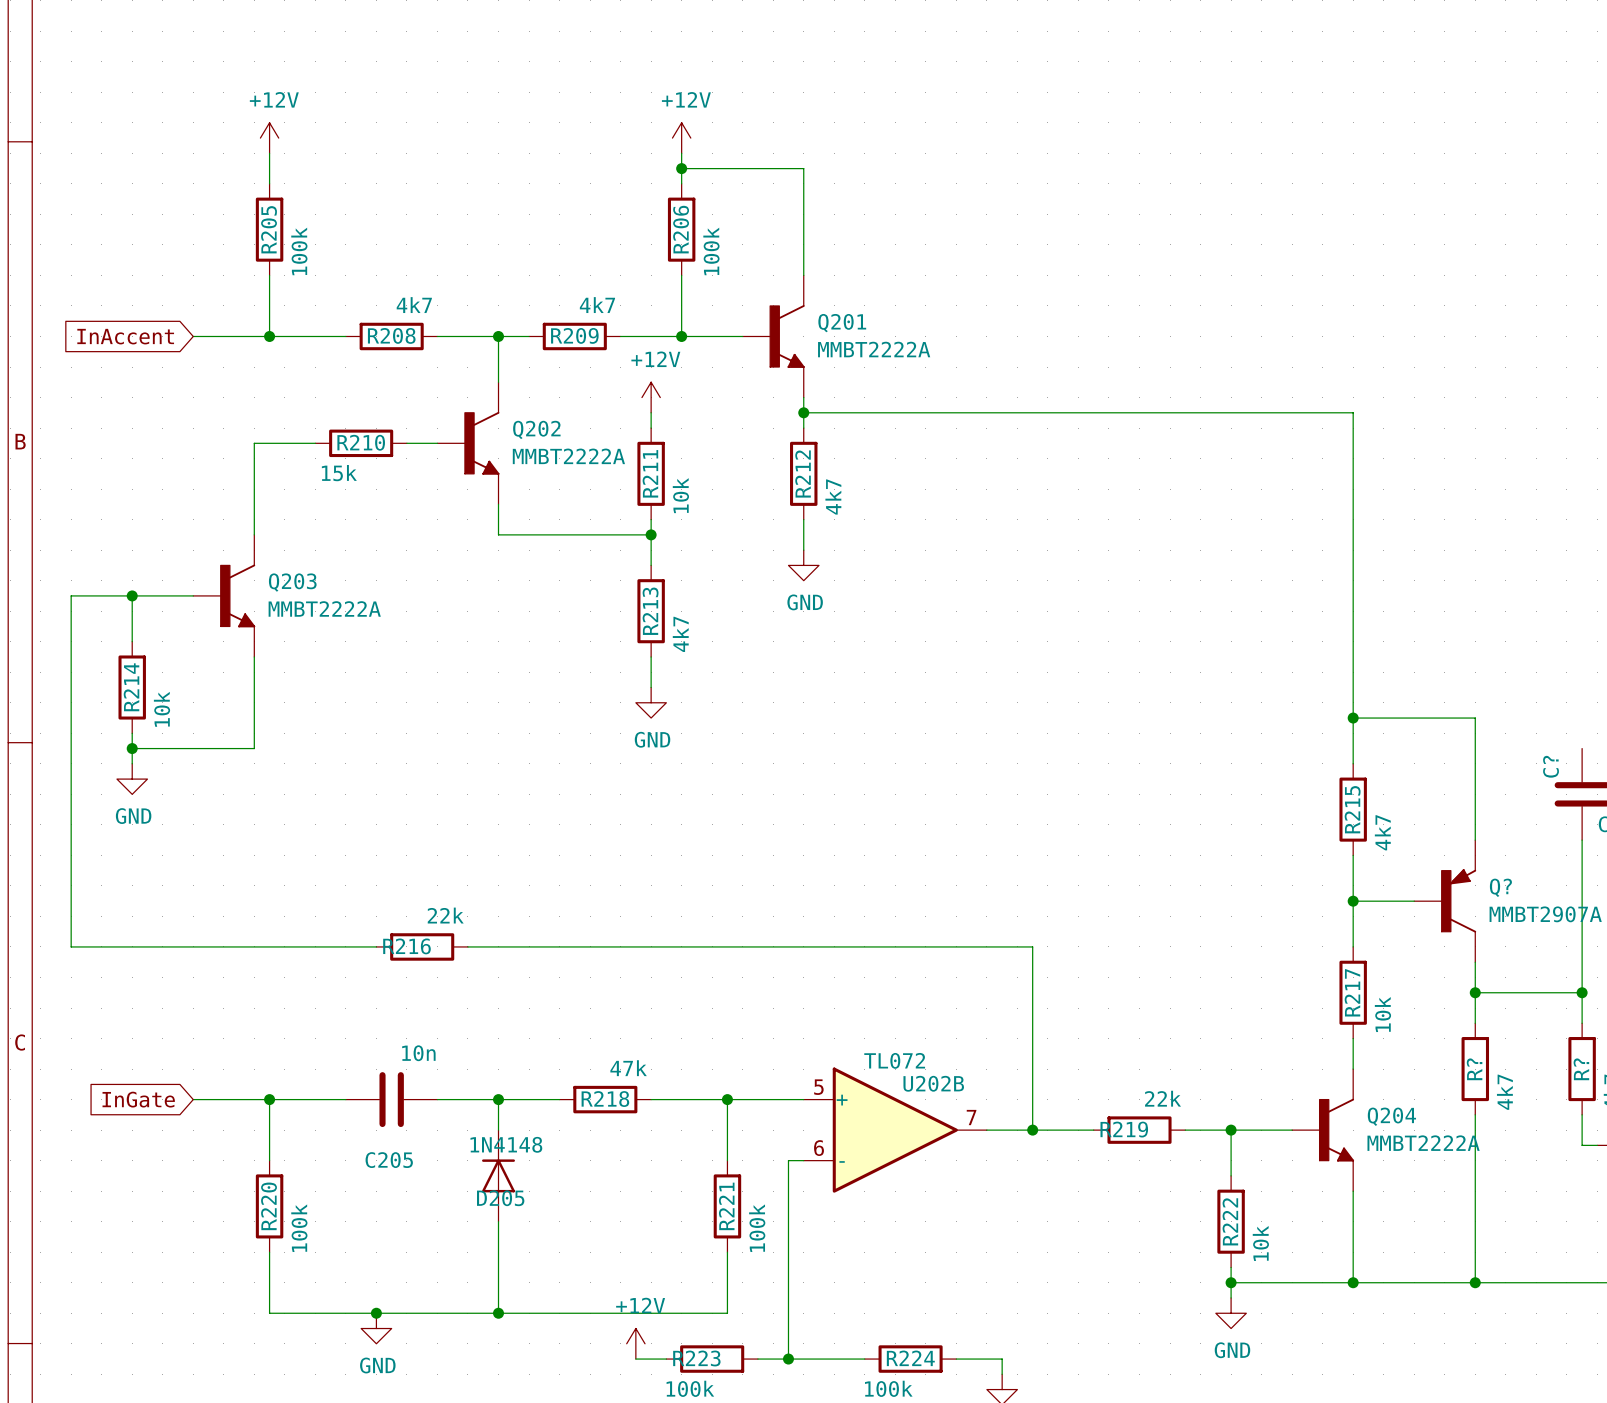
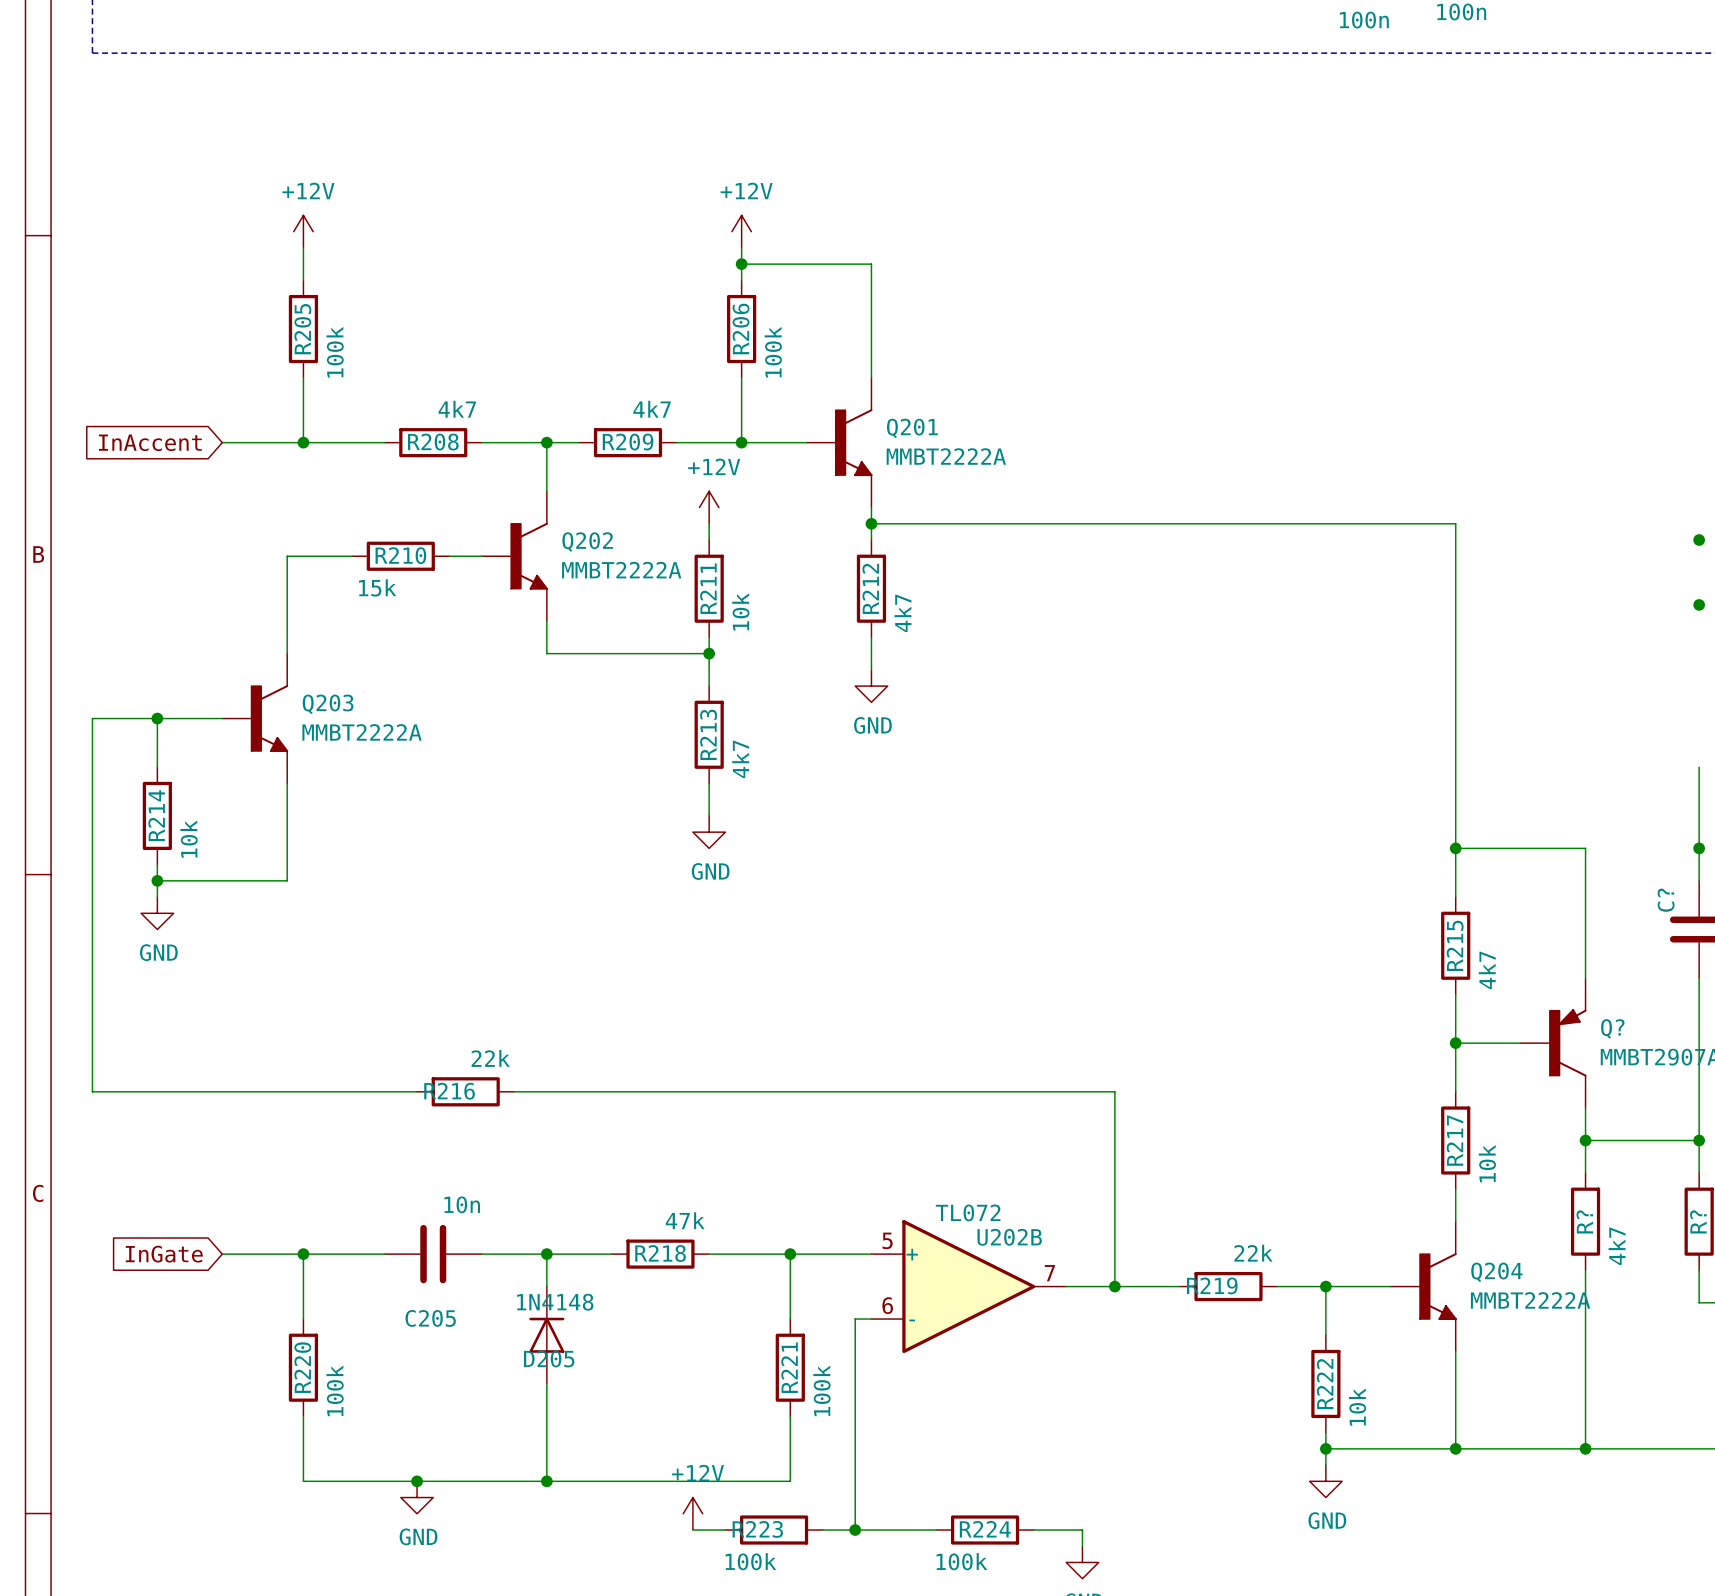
junction: none -> (1699, 540)
junction: none -> (1699, 604)
wire: none -> (1699, 767) (1699, 880)
junction: none -> (1699, 848)

